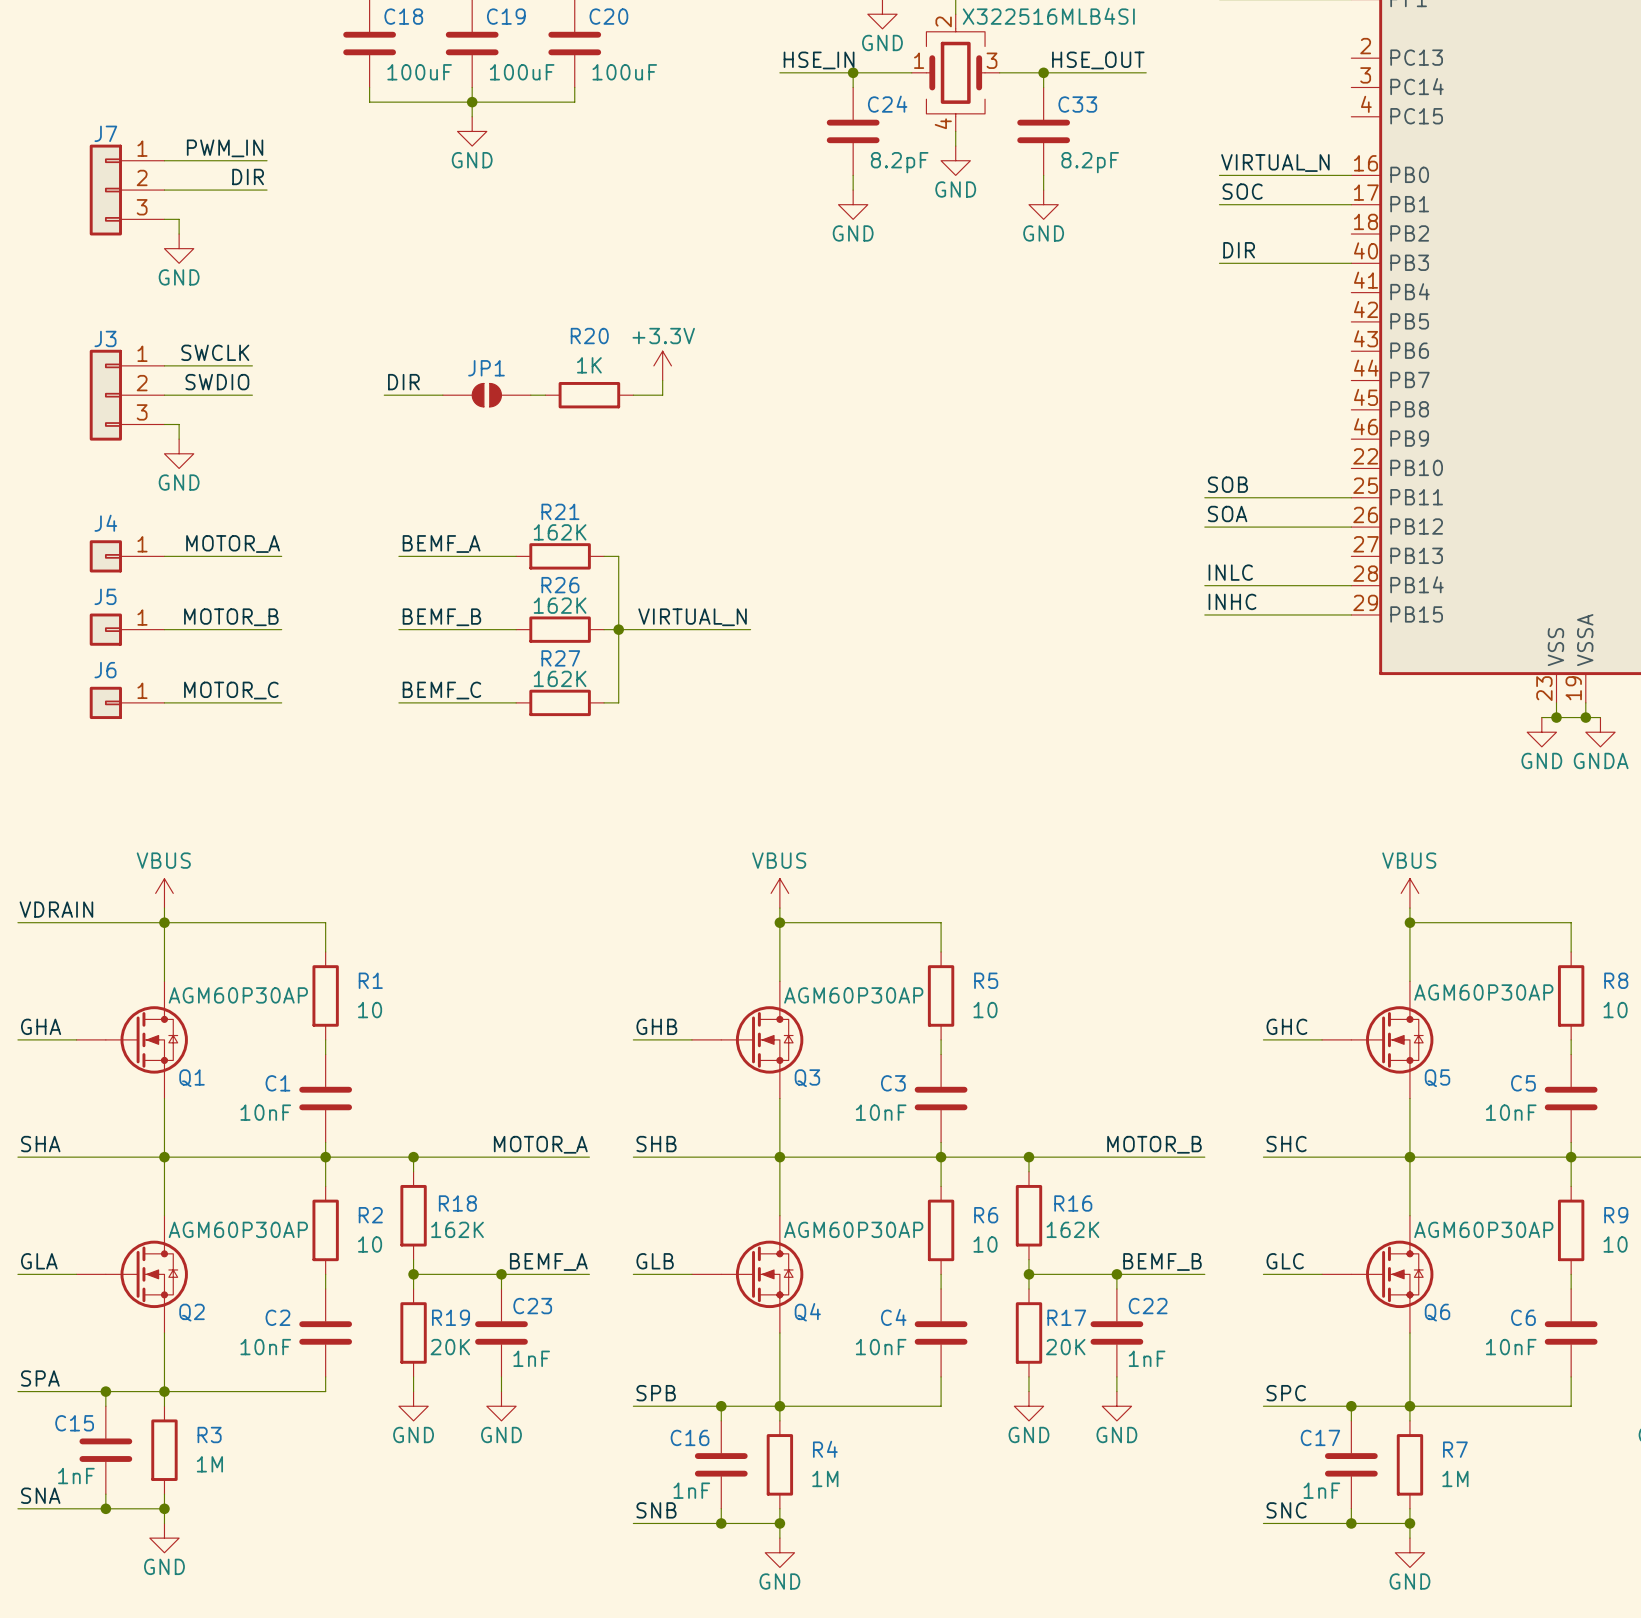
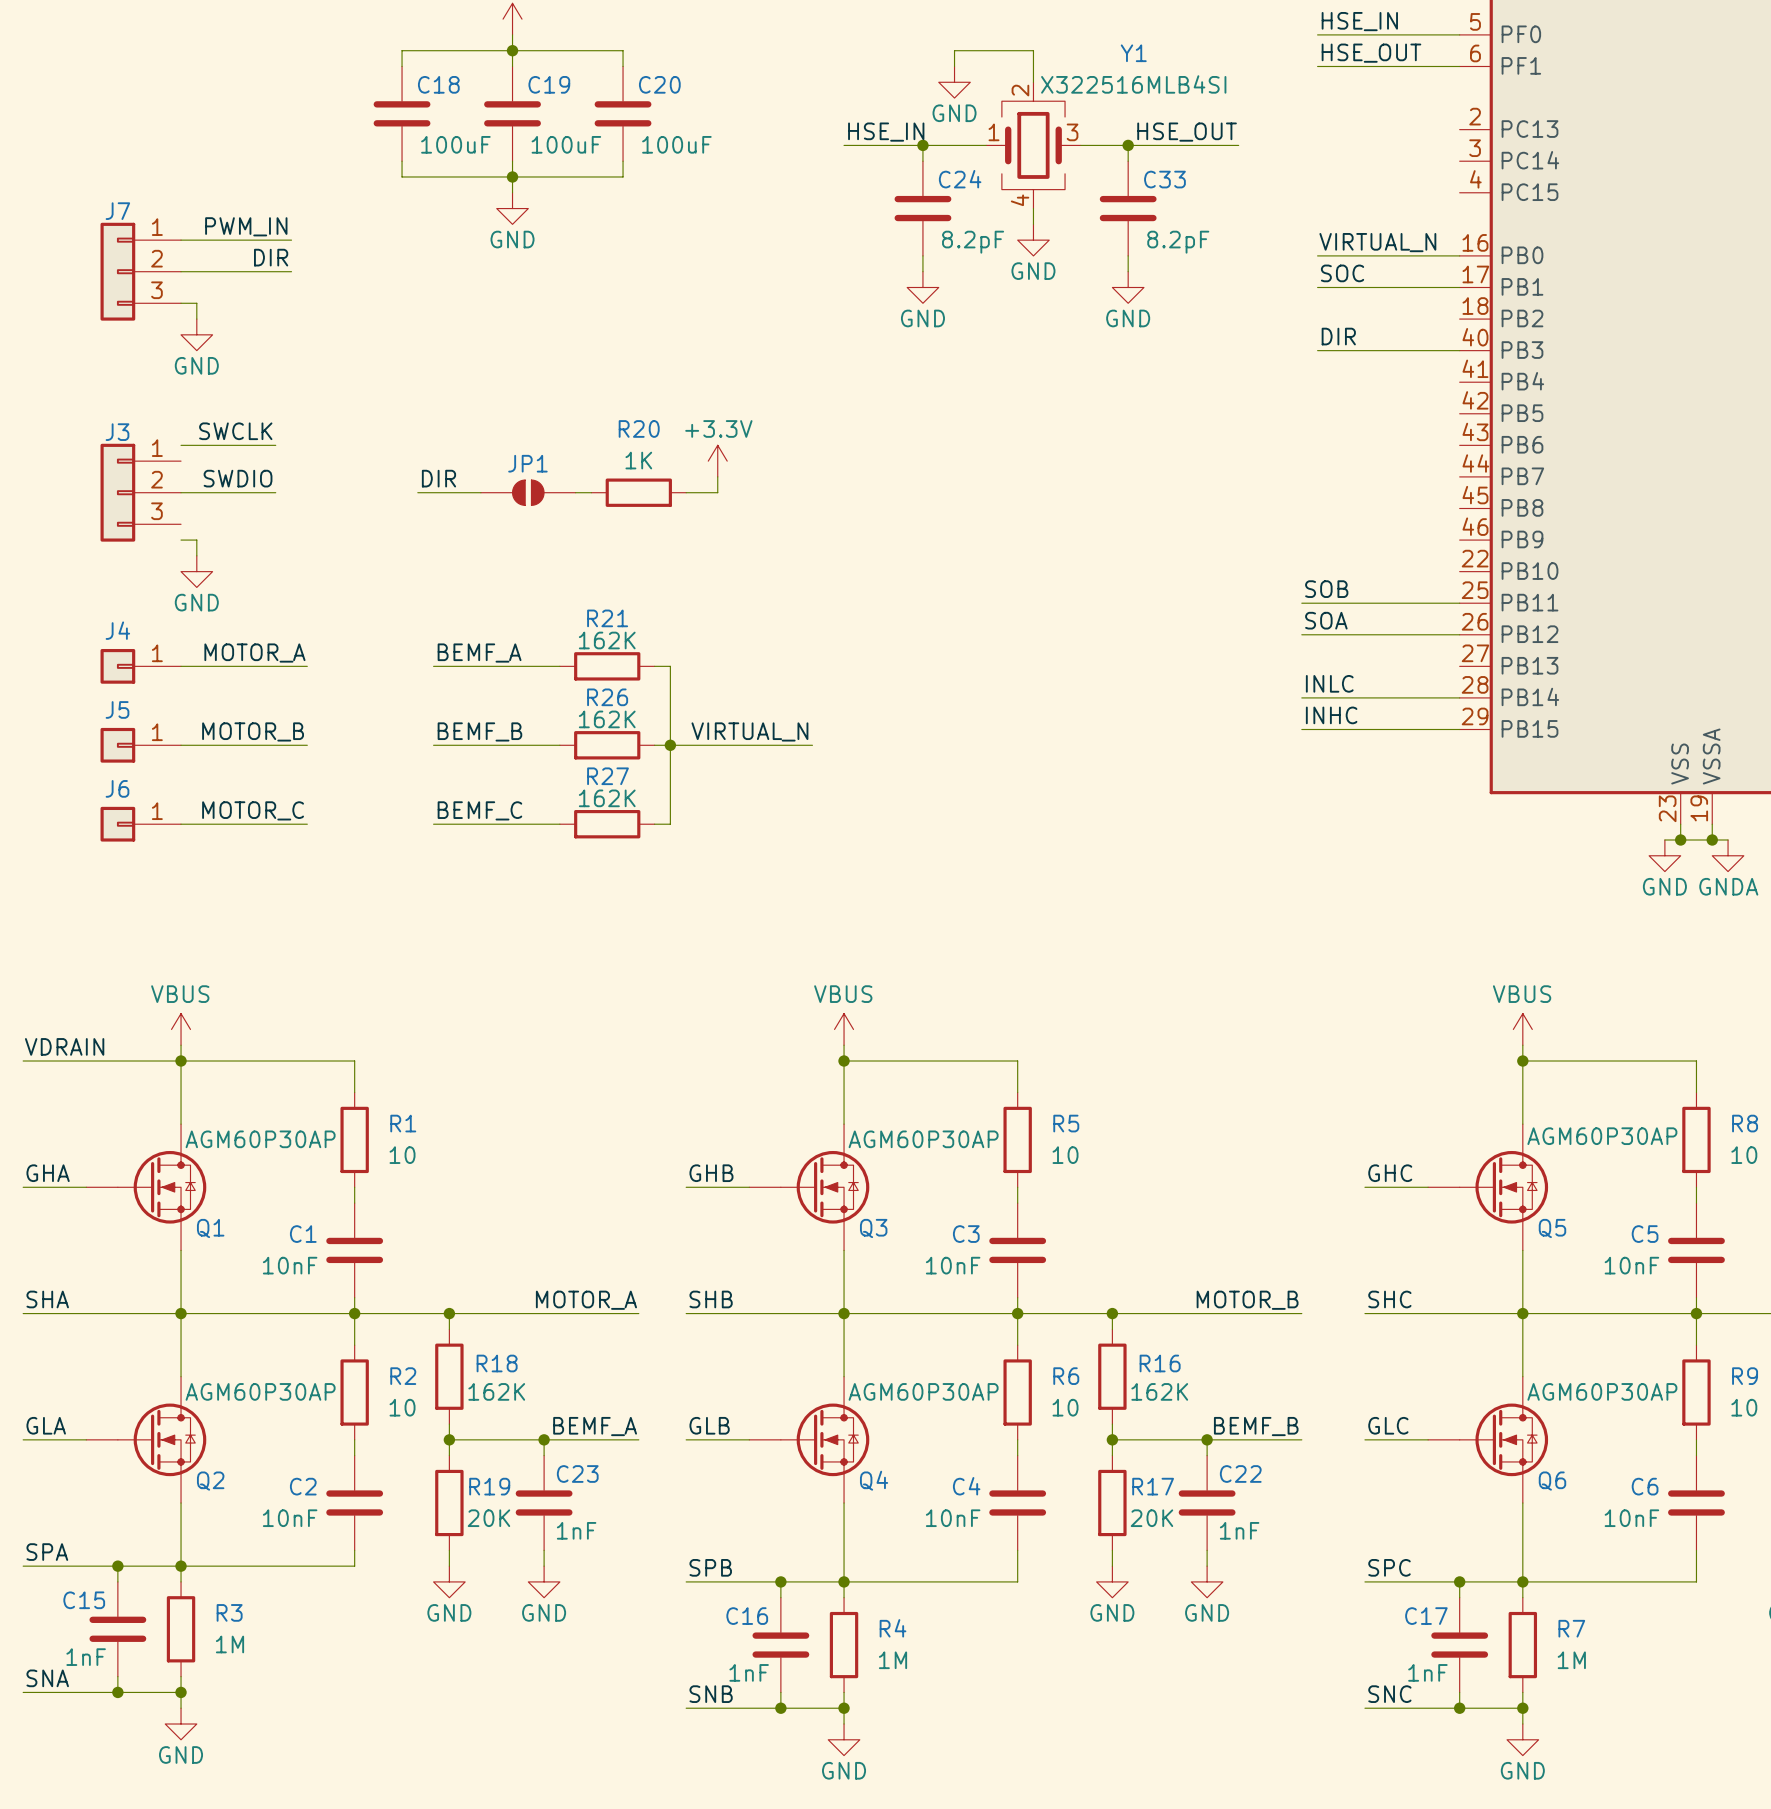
label position: SWCLK (215, 352) -> SWCLK (235, 431)
wire: (164, 365) (252, 365) -> (181, 445) (275, 445)
wire: (164, 424) (179, 424) (179, 439) -> (181, 540) (196, 540) (196, 555)
power symbol position: GND (179, 453) -> GND (196, 571)

